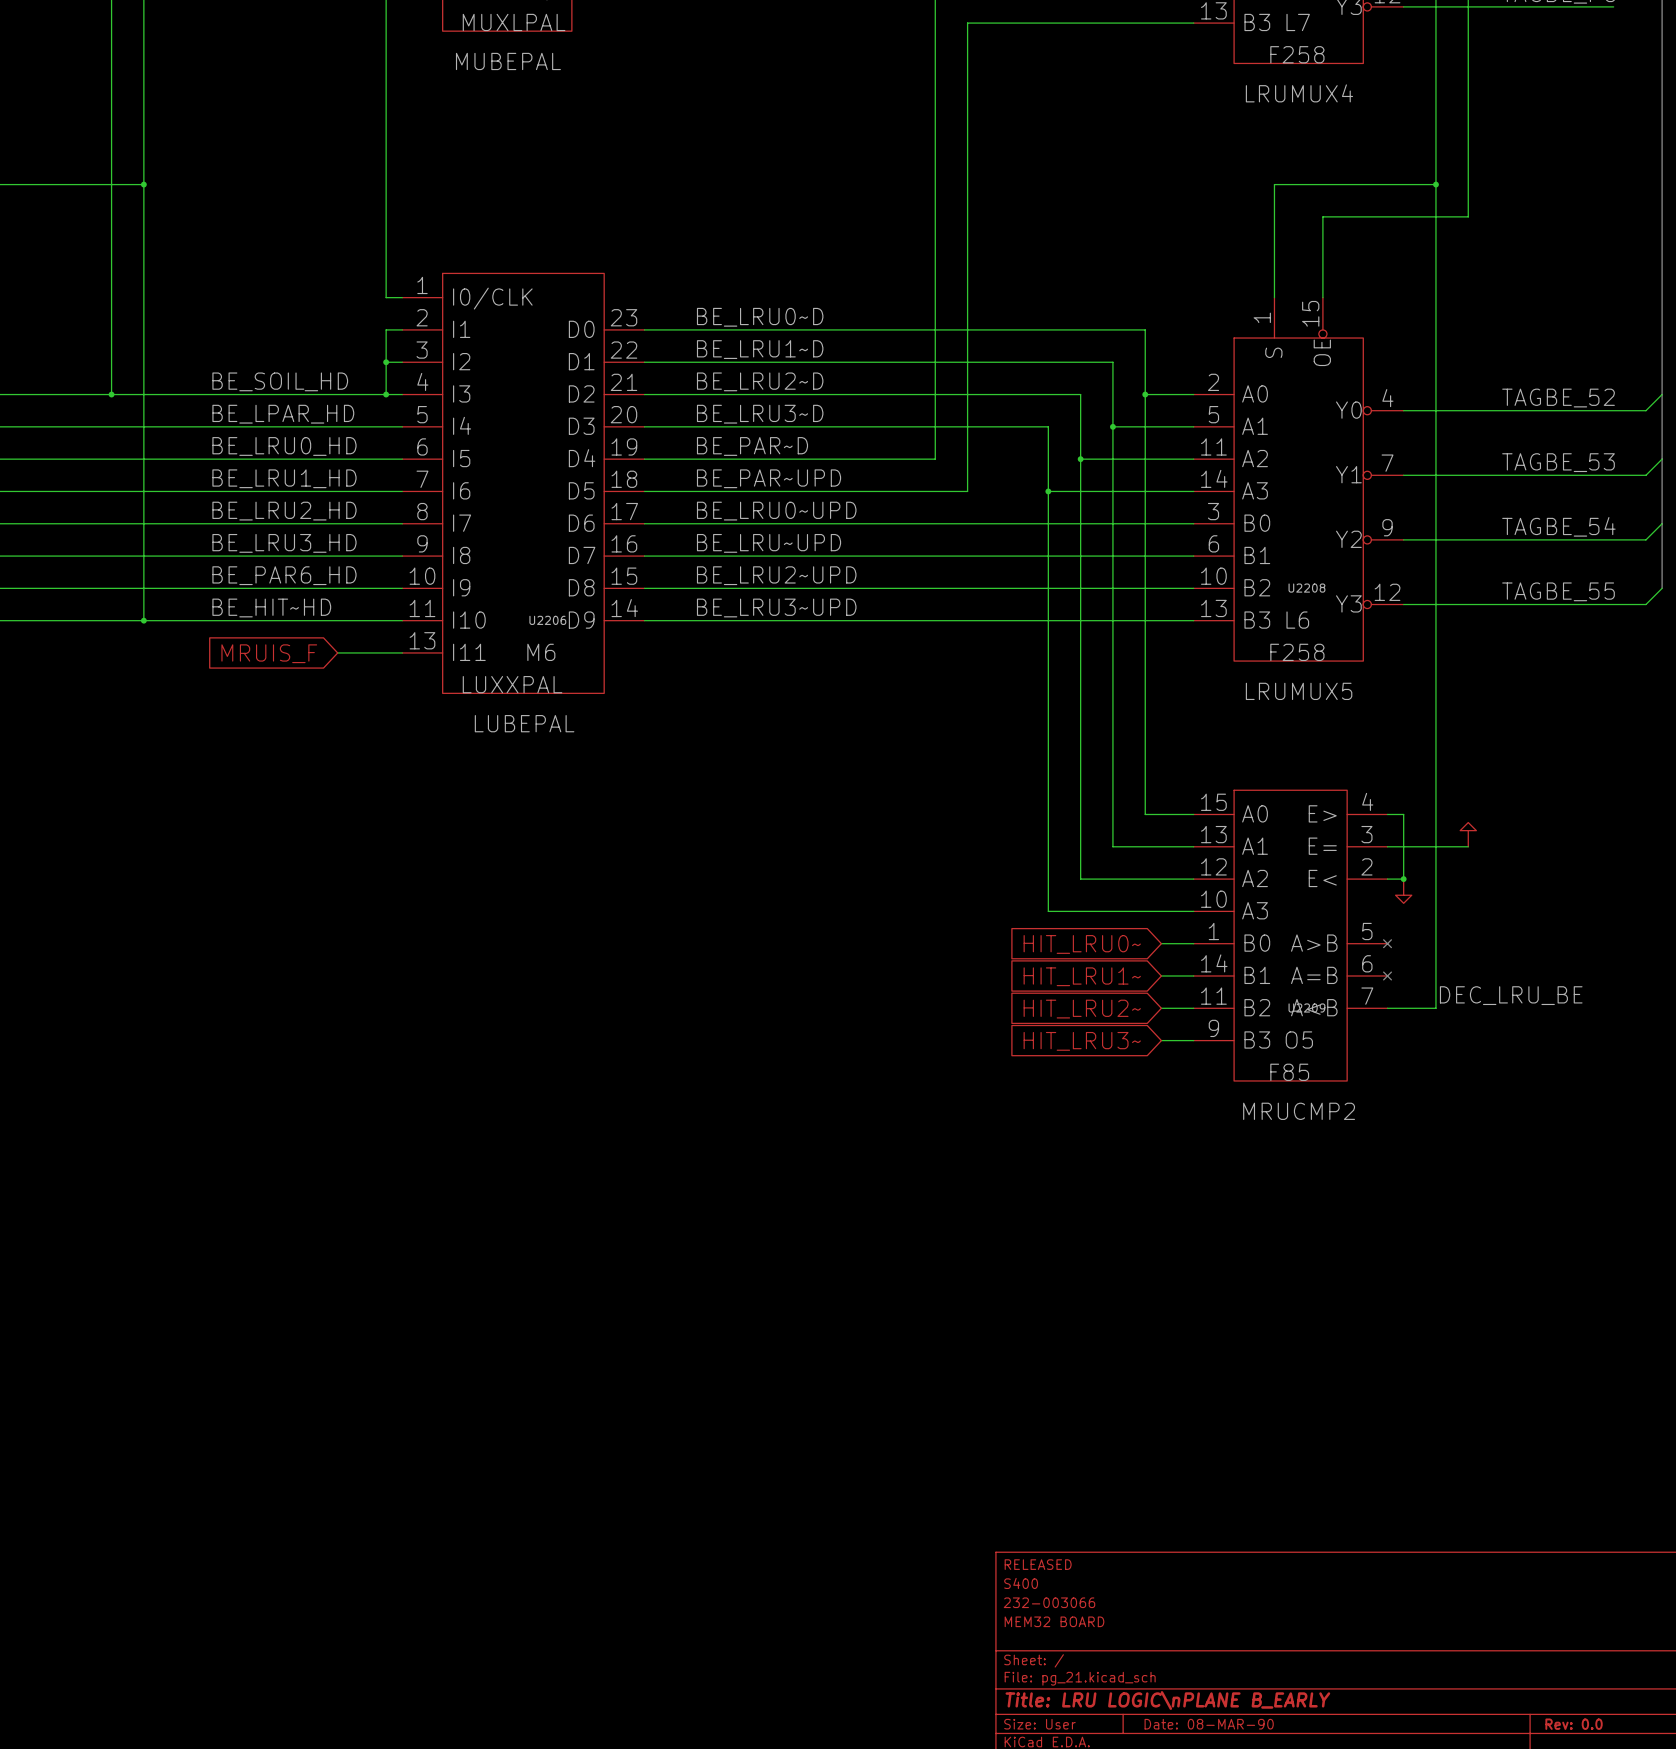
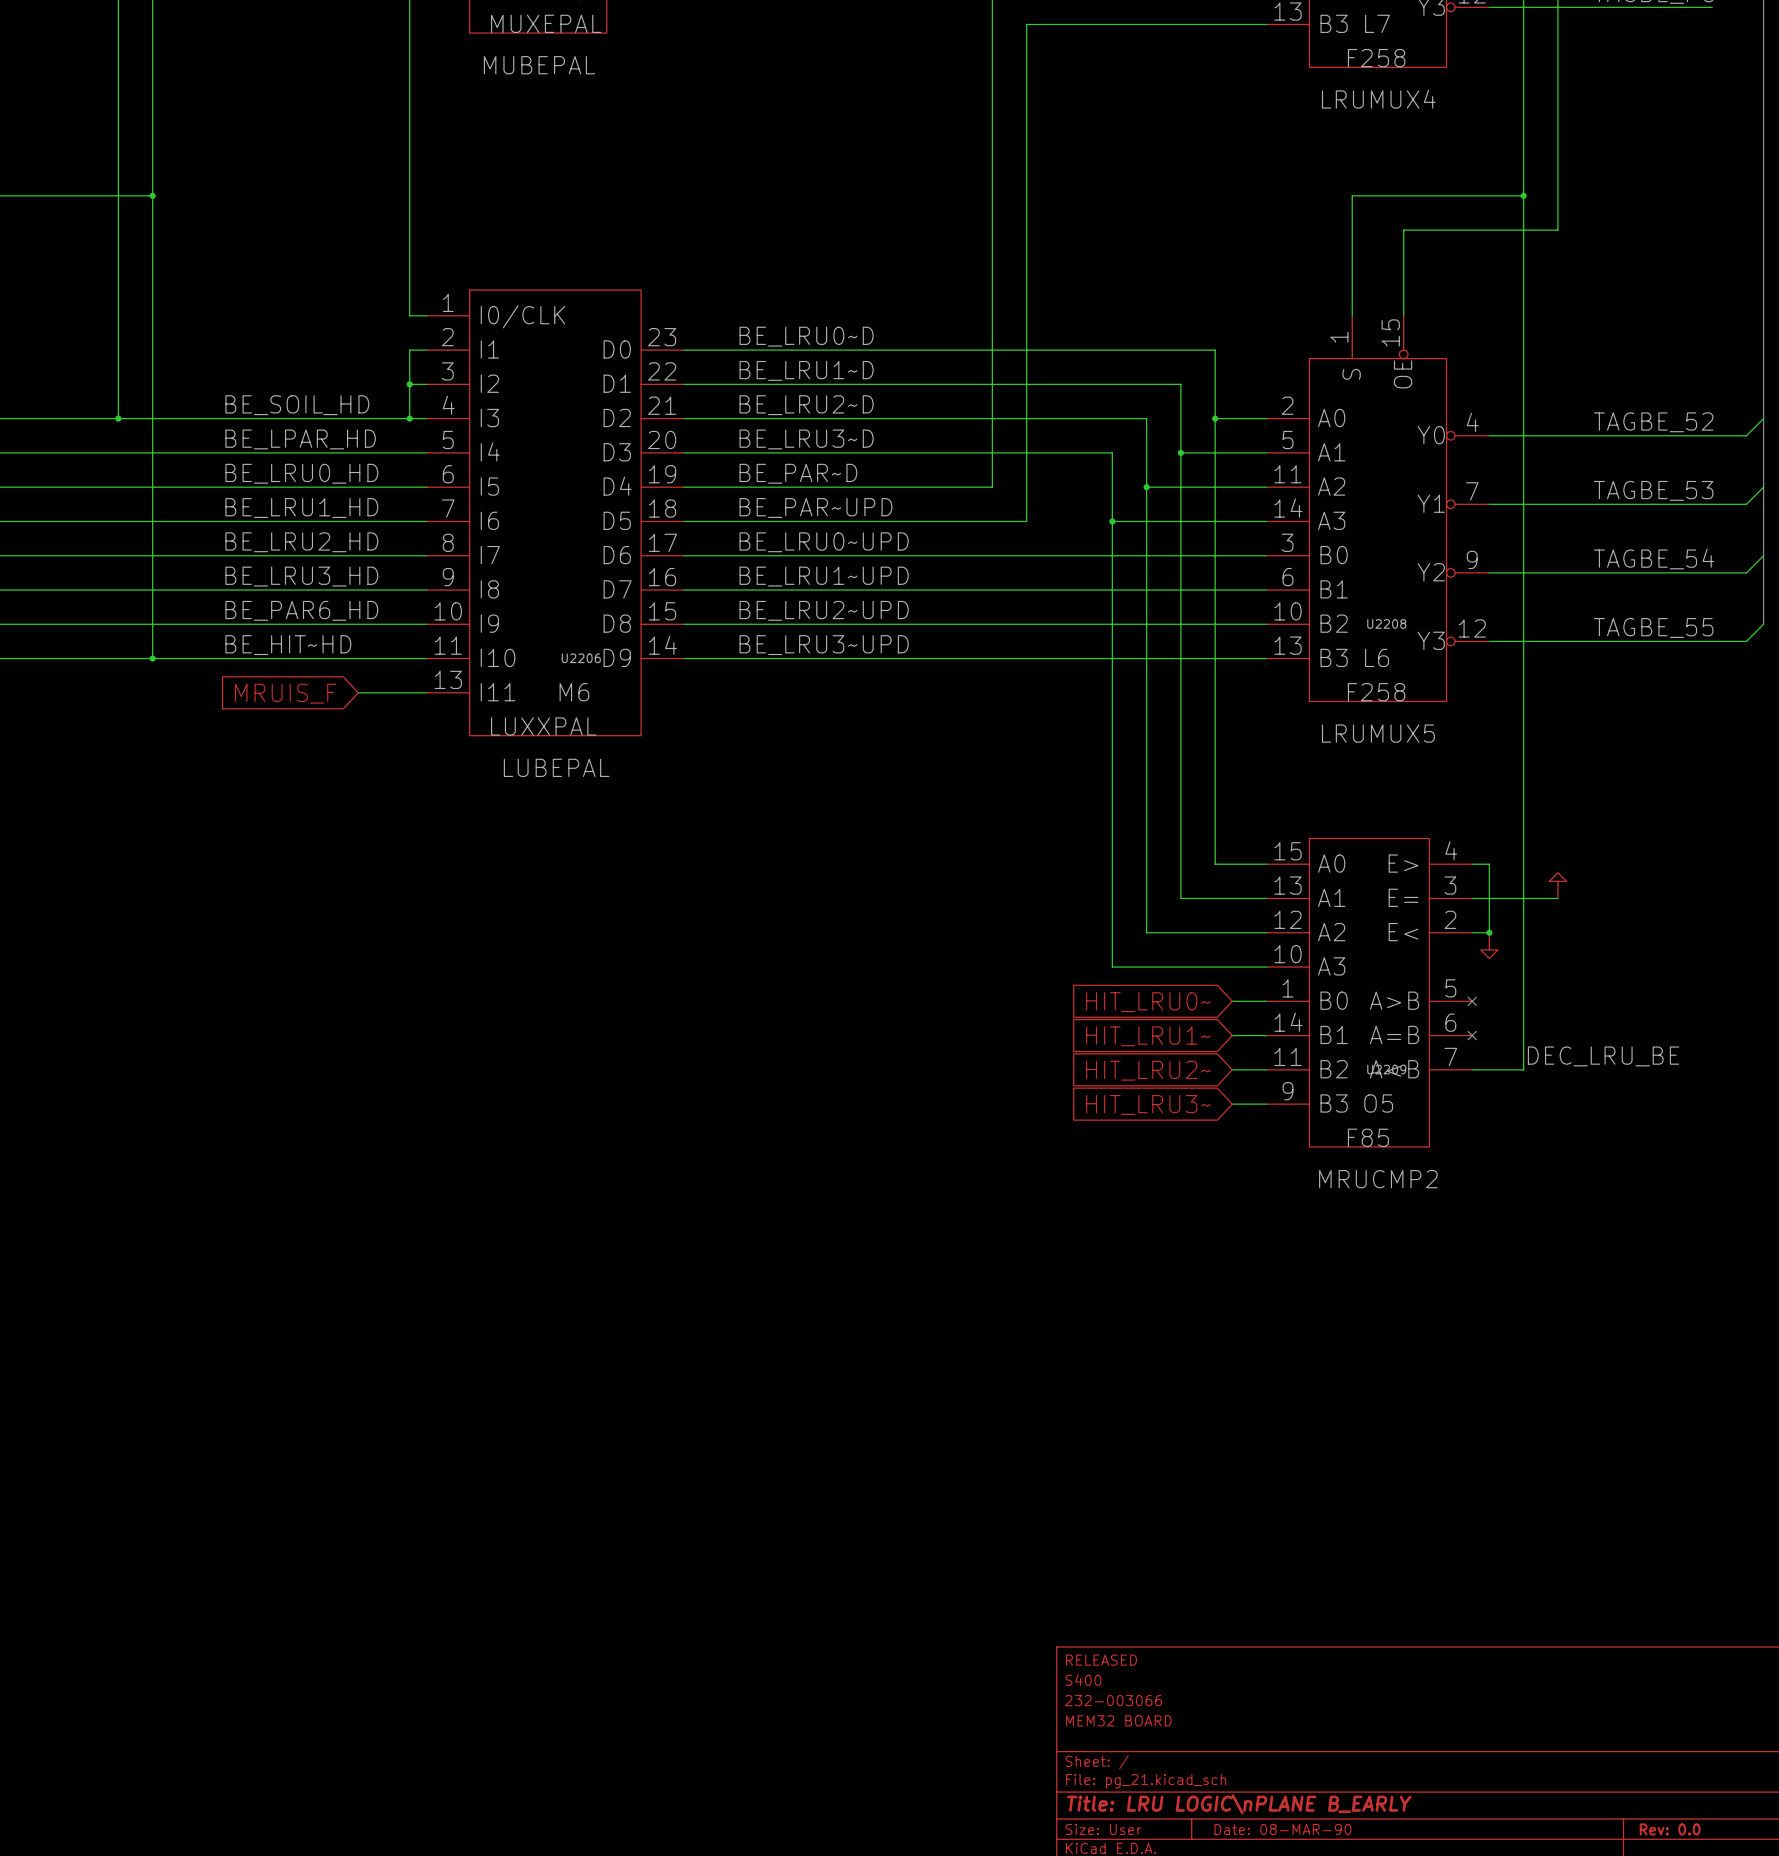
part value: MUXLPAL (514, 22) -> MUXEPAL (546, 23)
label: BE_LRU~UPD (769, 543) -> BE_LRU1~UPD (824, 576)

